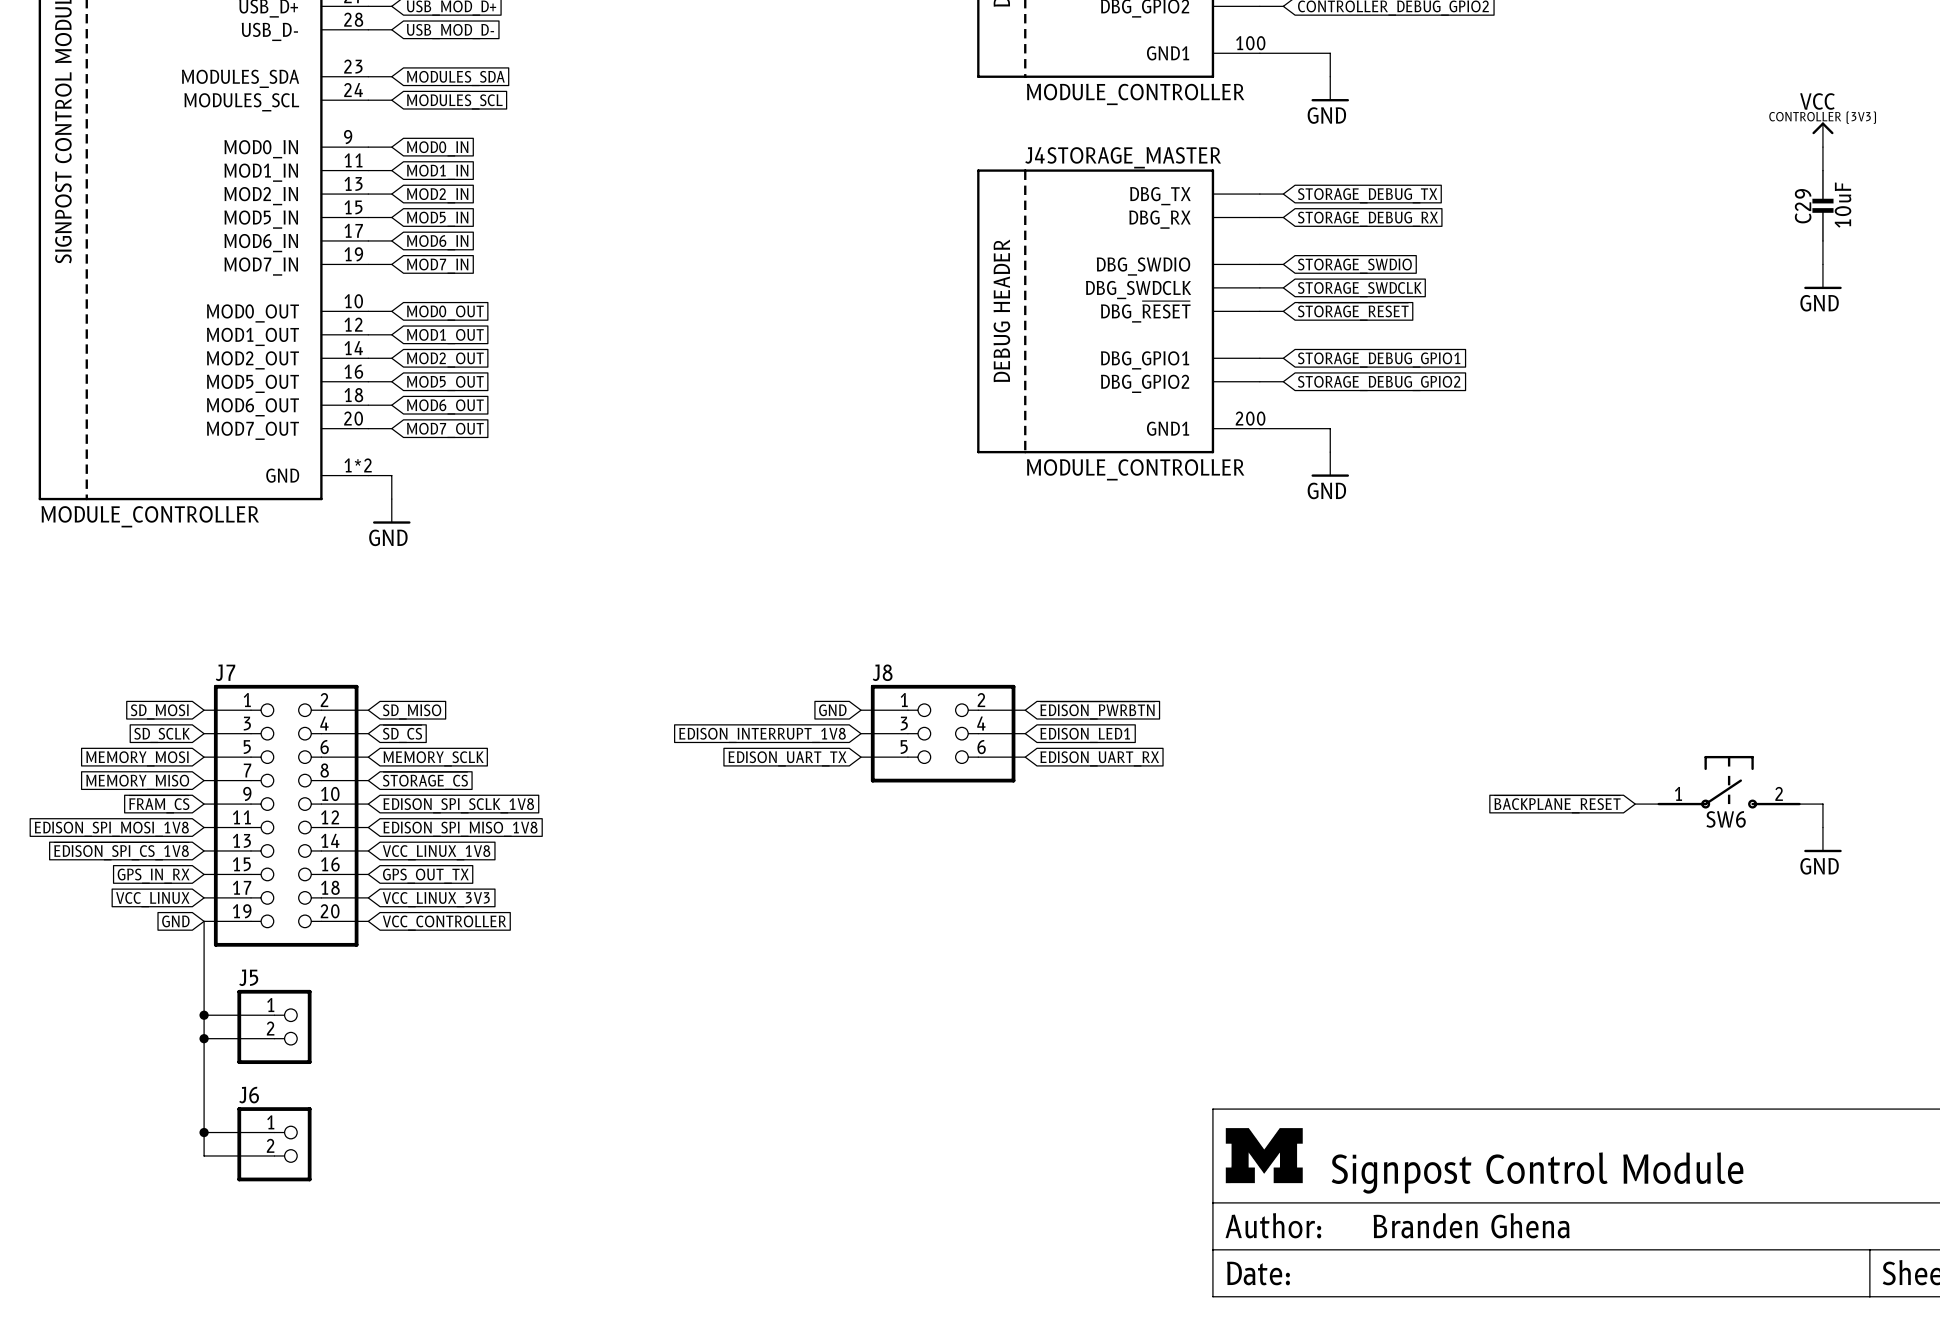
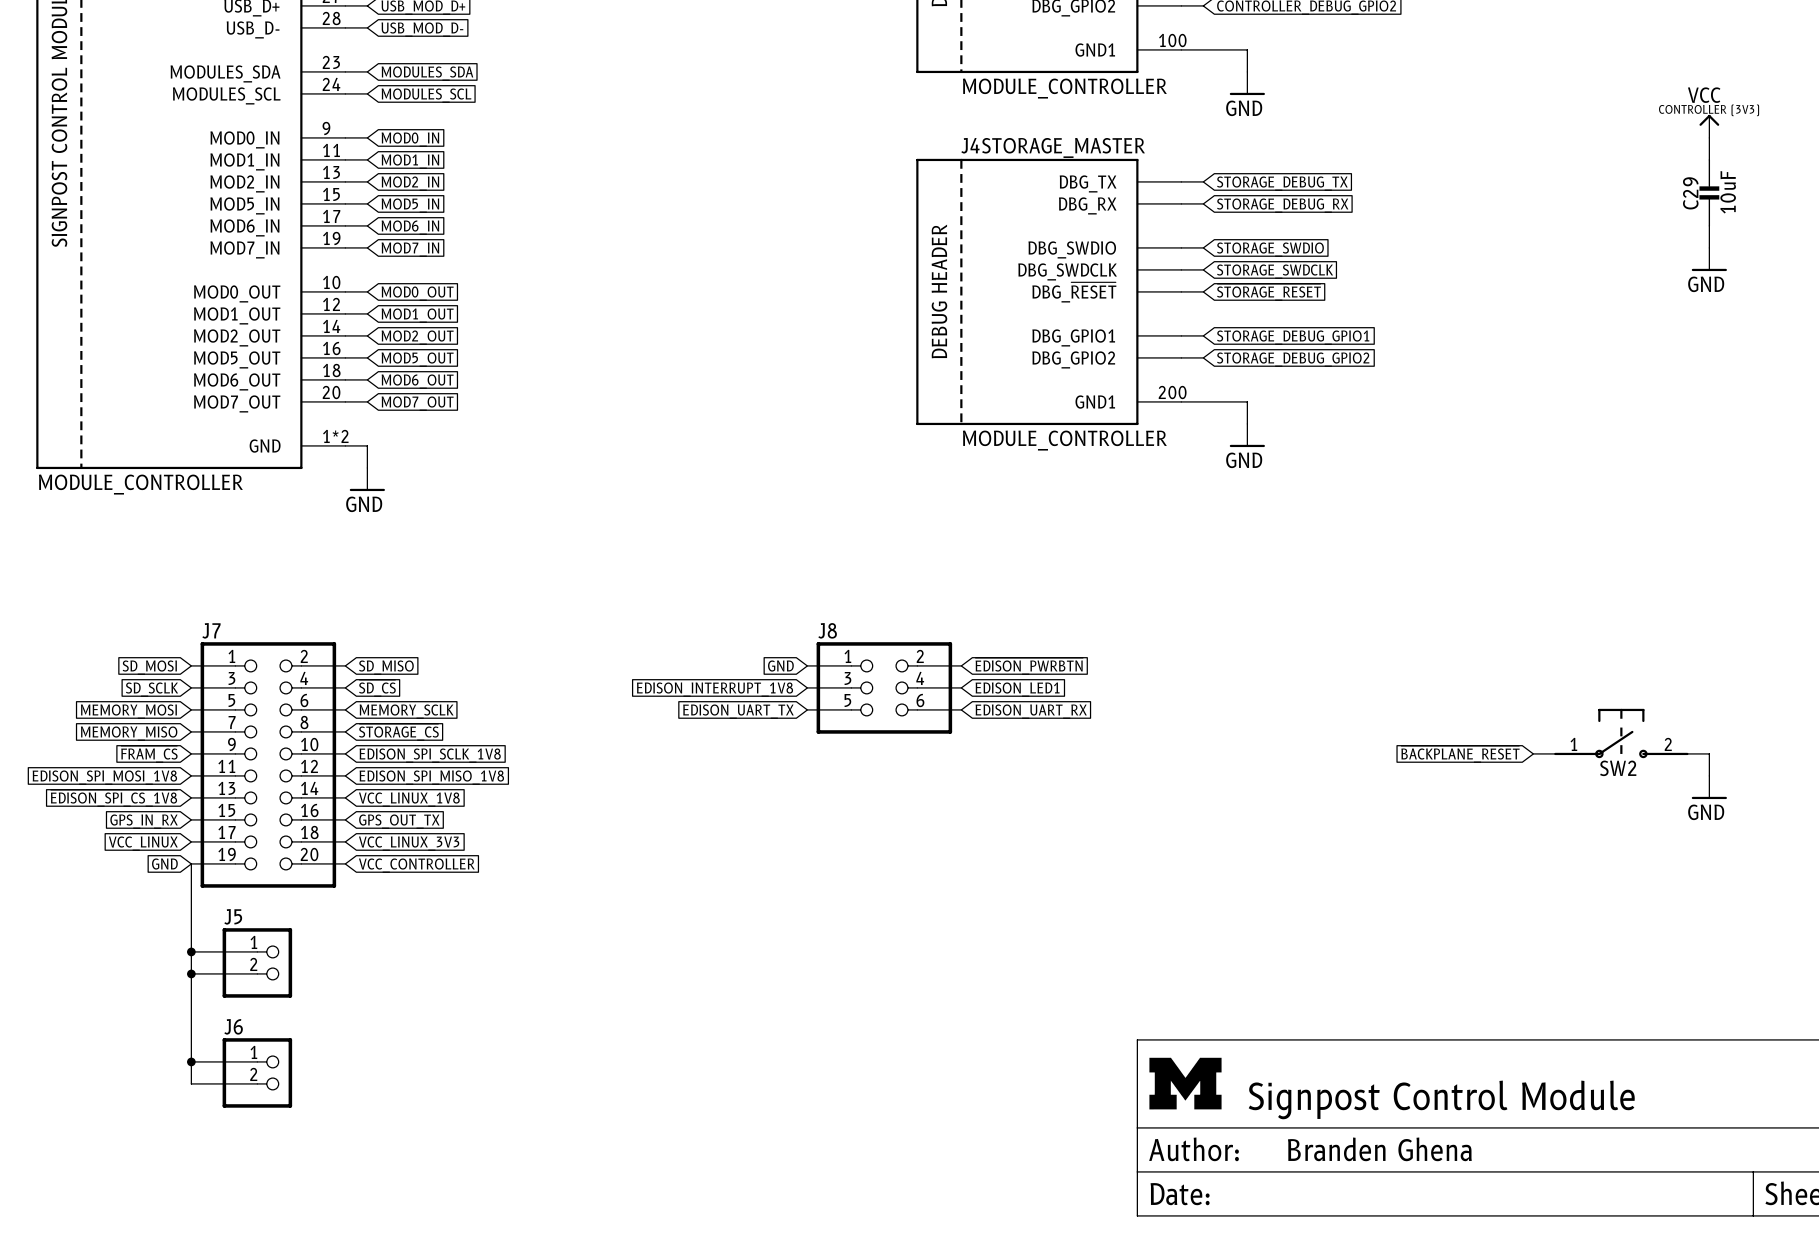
SW6 name: SW6 (1726, 819) -> SW2 (1618, 768)

